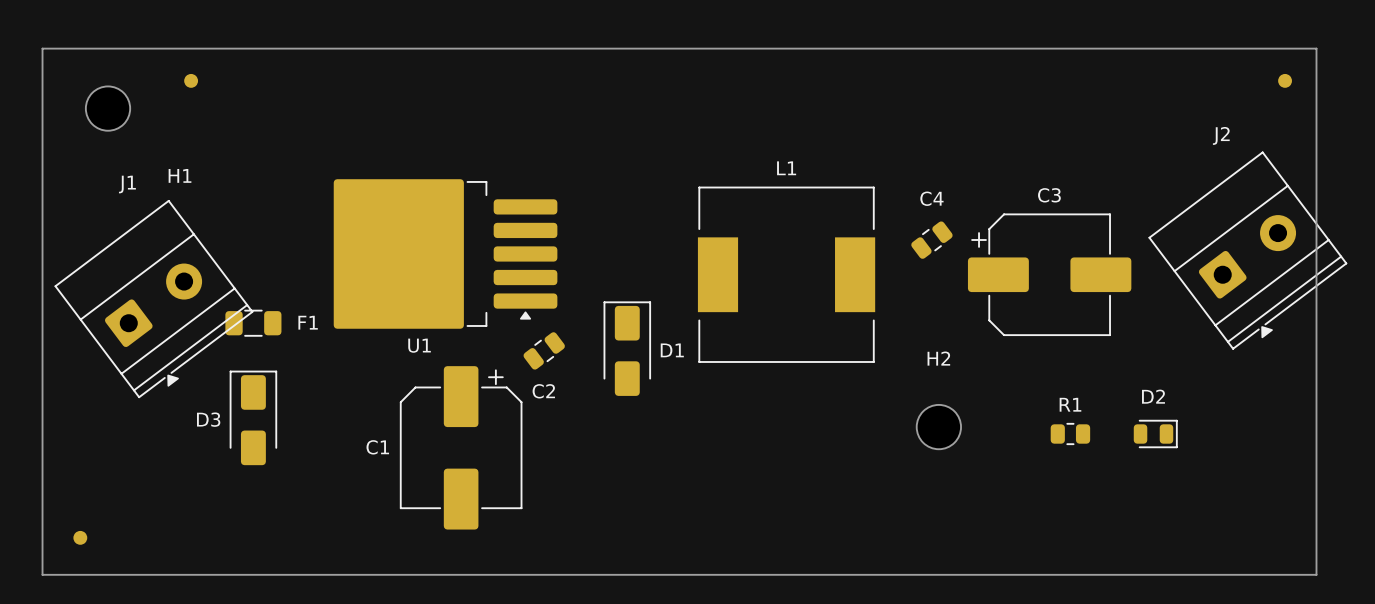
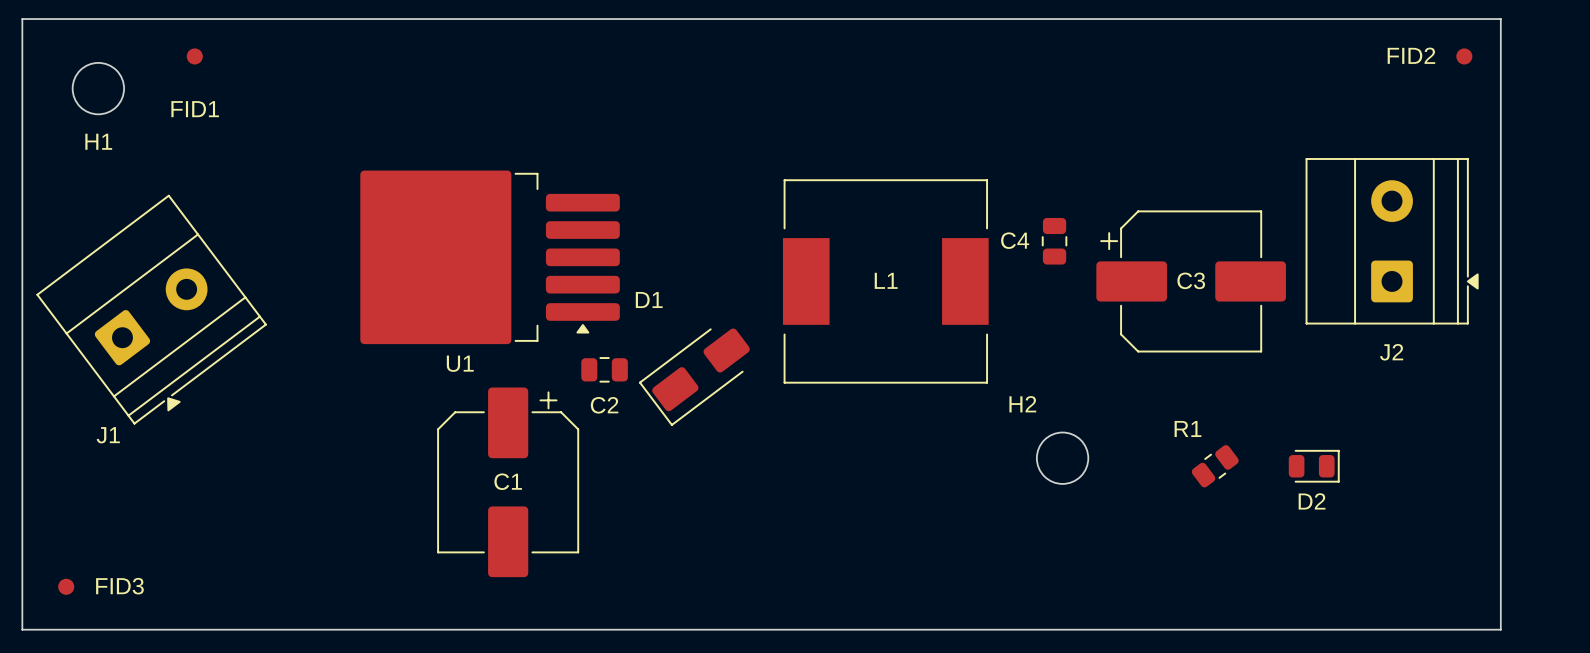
FID2 name: none -> FID2 (1411, 55)
FID1 name: none -> FID1 (195, 109)
J2 name position: J2 (1221, 135) -> J2 (1391, 352)
L1 name position: L1 (786, 168) -> L1 (886, 280)
H1 name position: H1 (180, 175) -> H1 (98, 141)
J1 name position: J1 (127, 184) -> J1 (108, 435)
C3 name position: C3 (1049, 195) -> C3 (1191, 280)
C4 rotation: 0° (931, 240) -> 53° counterclockwise (1054, 241)
J2 rotation: 0° (1247, 250) -> 53° counterclockwise (1392, 241)
F1: (253, 323) -> none
D1 rotation: 0° (627, 348) -> 127° counterclockwise (694, 377)
C2 rotation: 0° (544, 350) -> 37° clockwise (604, 369)
D1 name position: D1 (672, 350) -> D1 (649, 299)
H2 name position: H2 (938, 358) -> H2 (1022, 404)
D2 name position: D2 (1153, 396) -> D2 (1312, 501)
D3: (253, 417) -> none
R1 rotation: 0° (1070, 433) -> 37° counterclockwise (1215, 466)
C1 name position: C1 (377, 447) -> C1 (508, 481)
FID3 name: none -> FID3 (119, 586)

